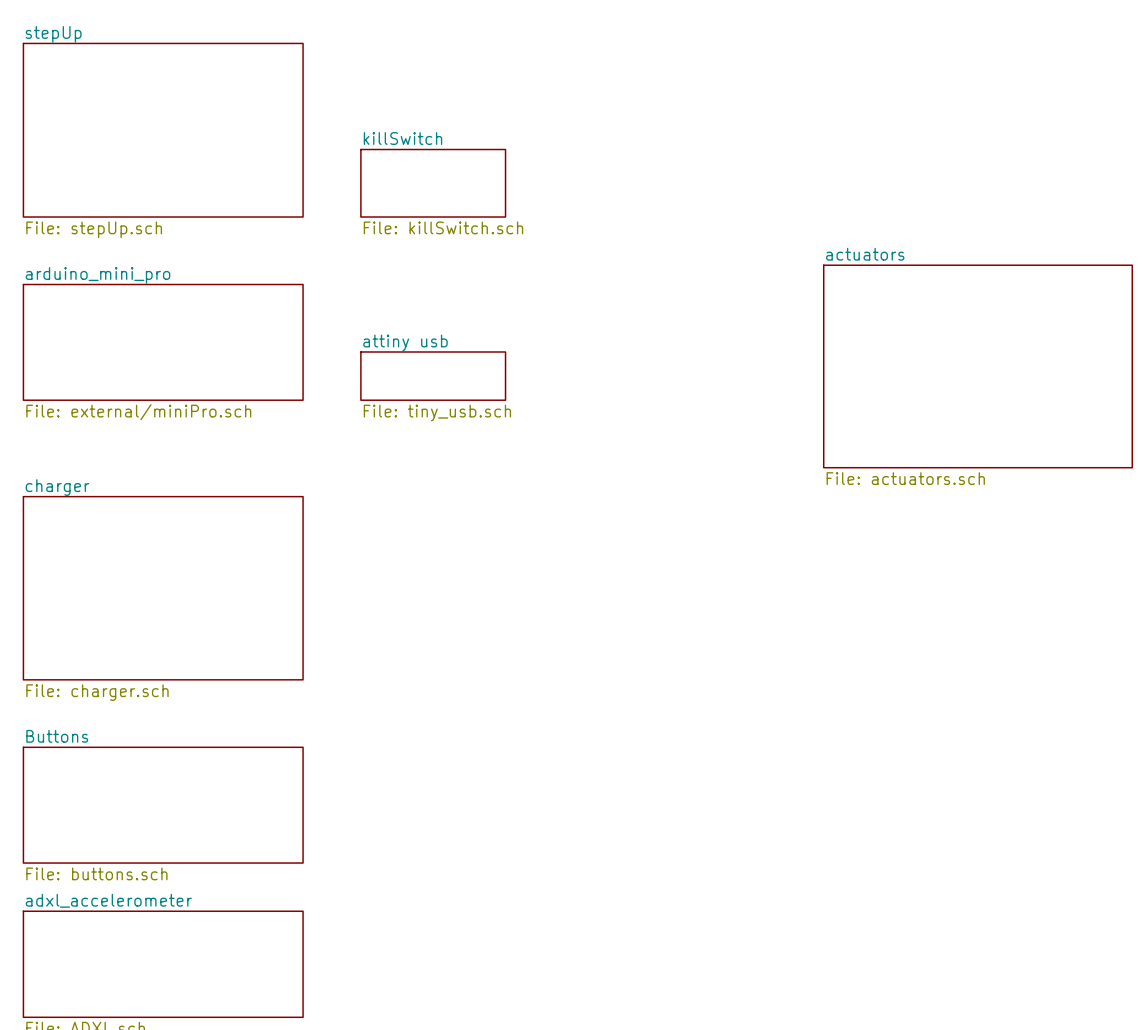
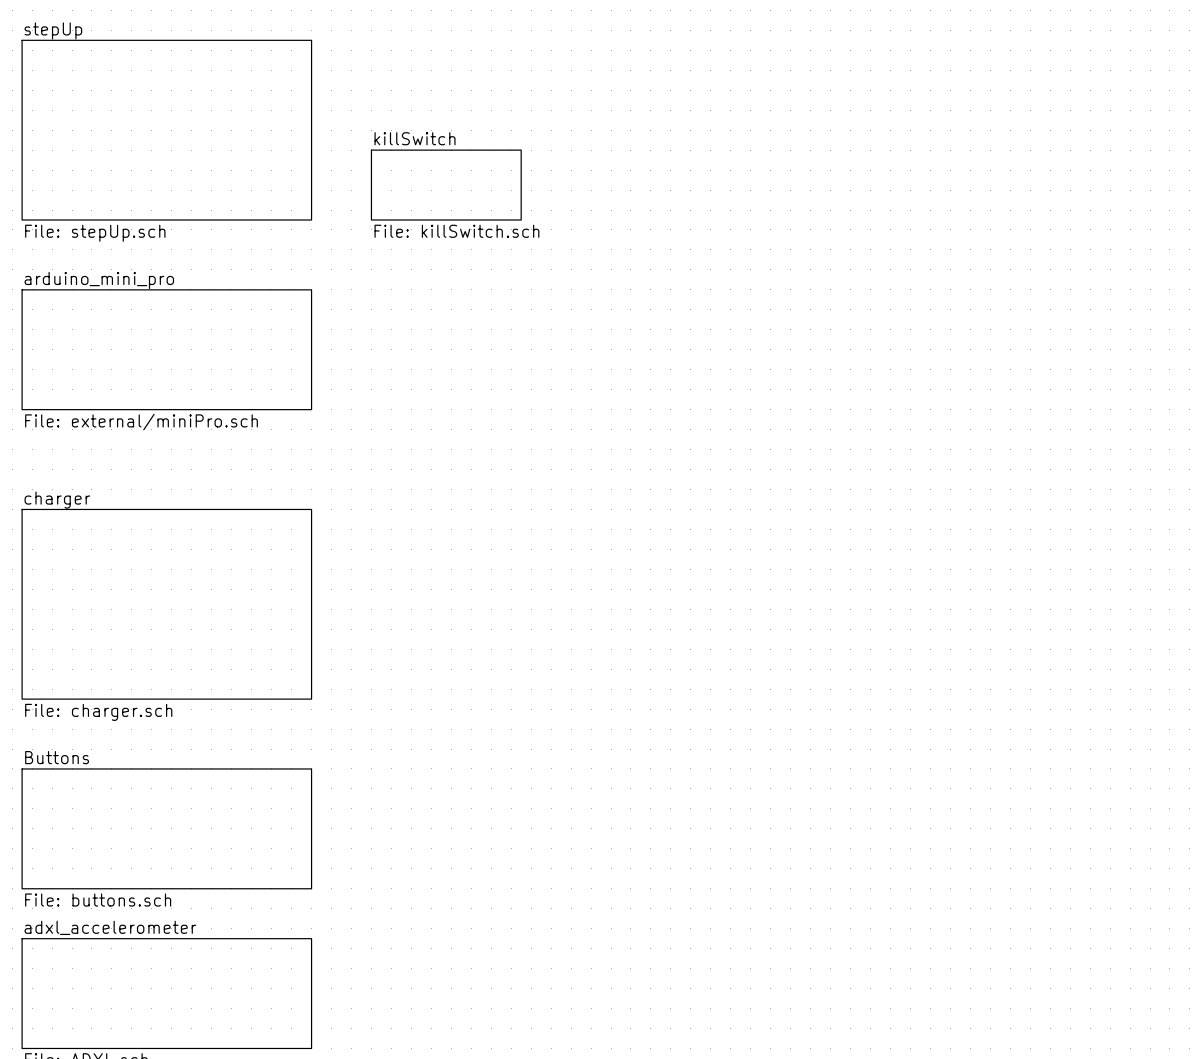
sheet actuators: File: actuators.sch (977, 366) -> none
sheet attiny usb: File: tiny_usb.sch (433, 376) -> none

